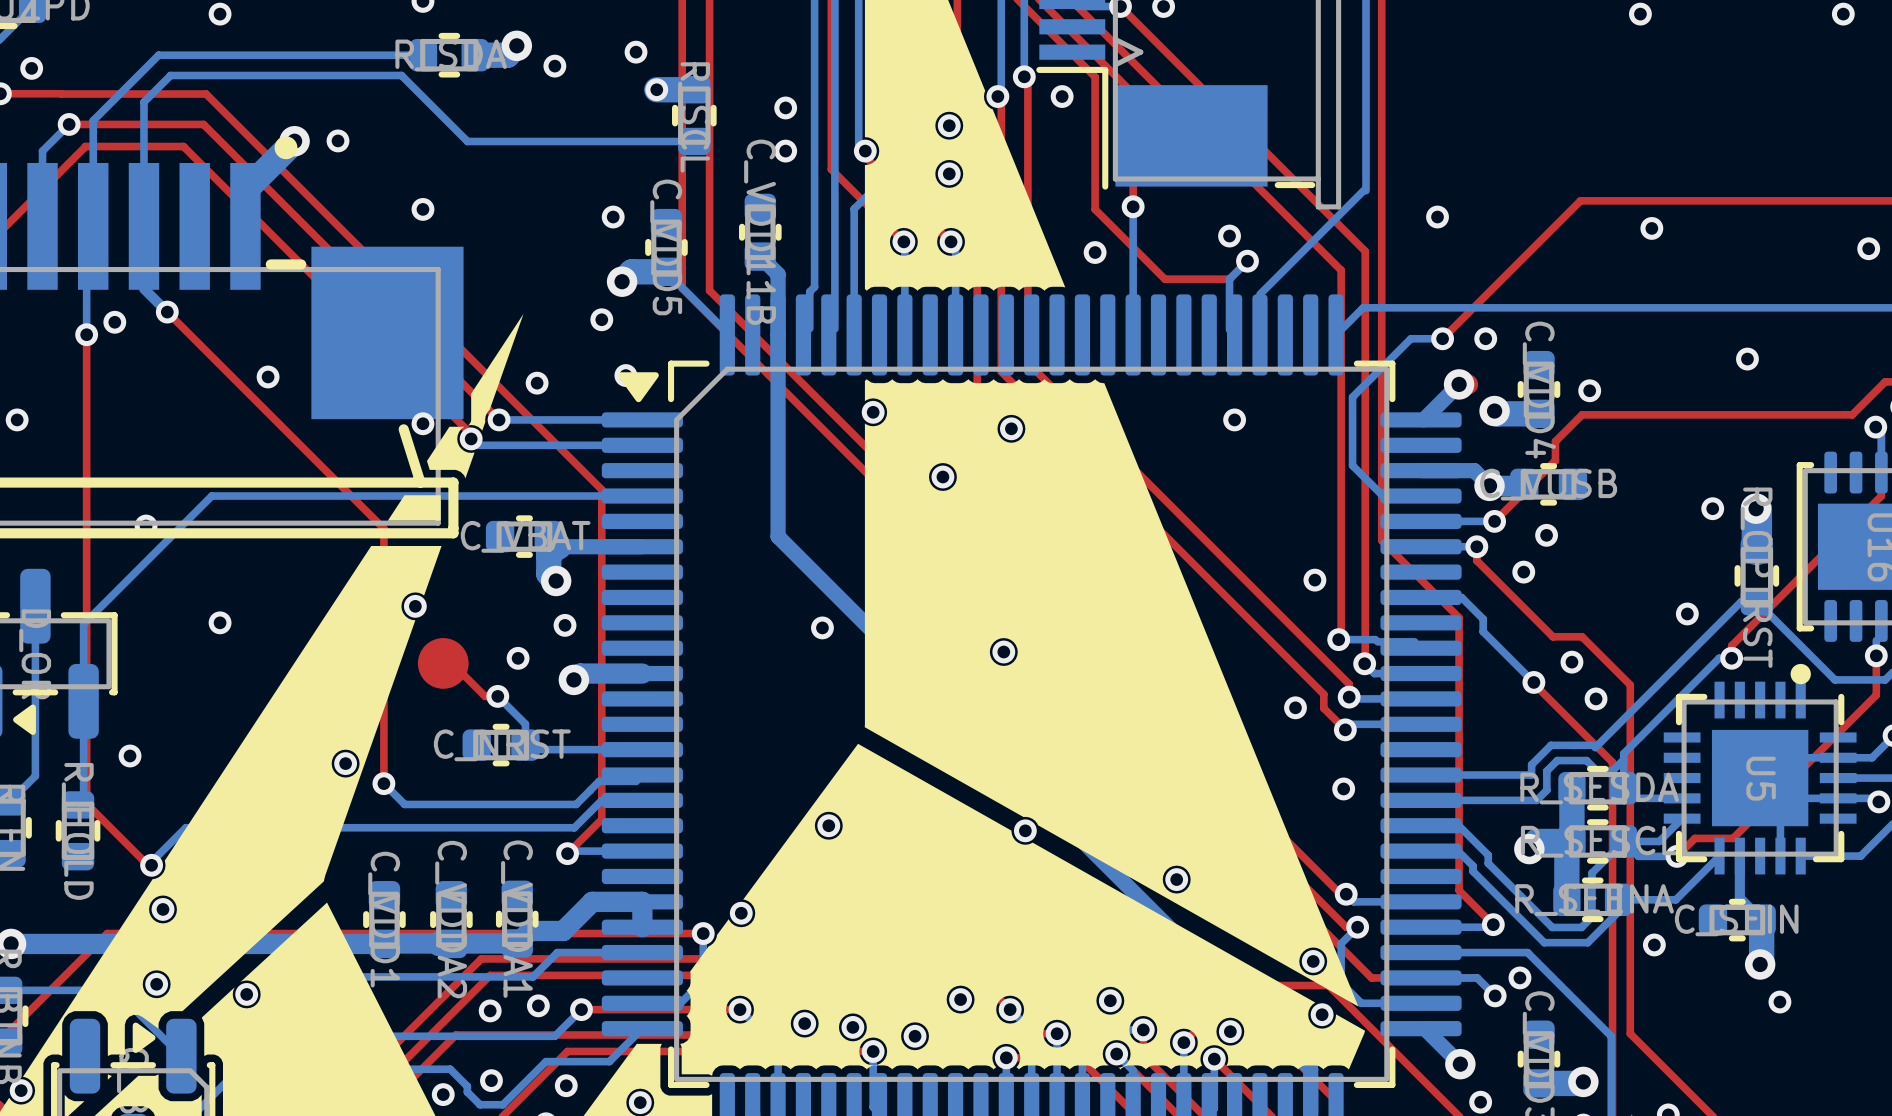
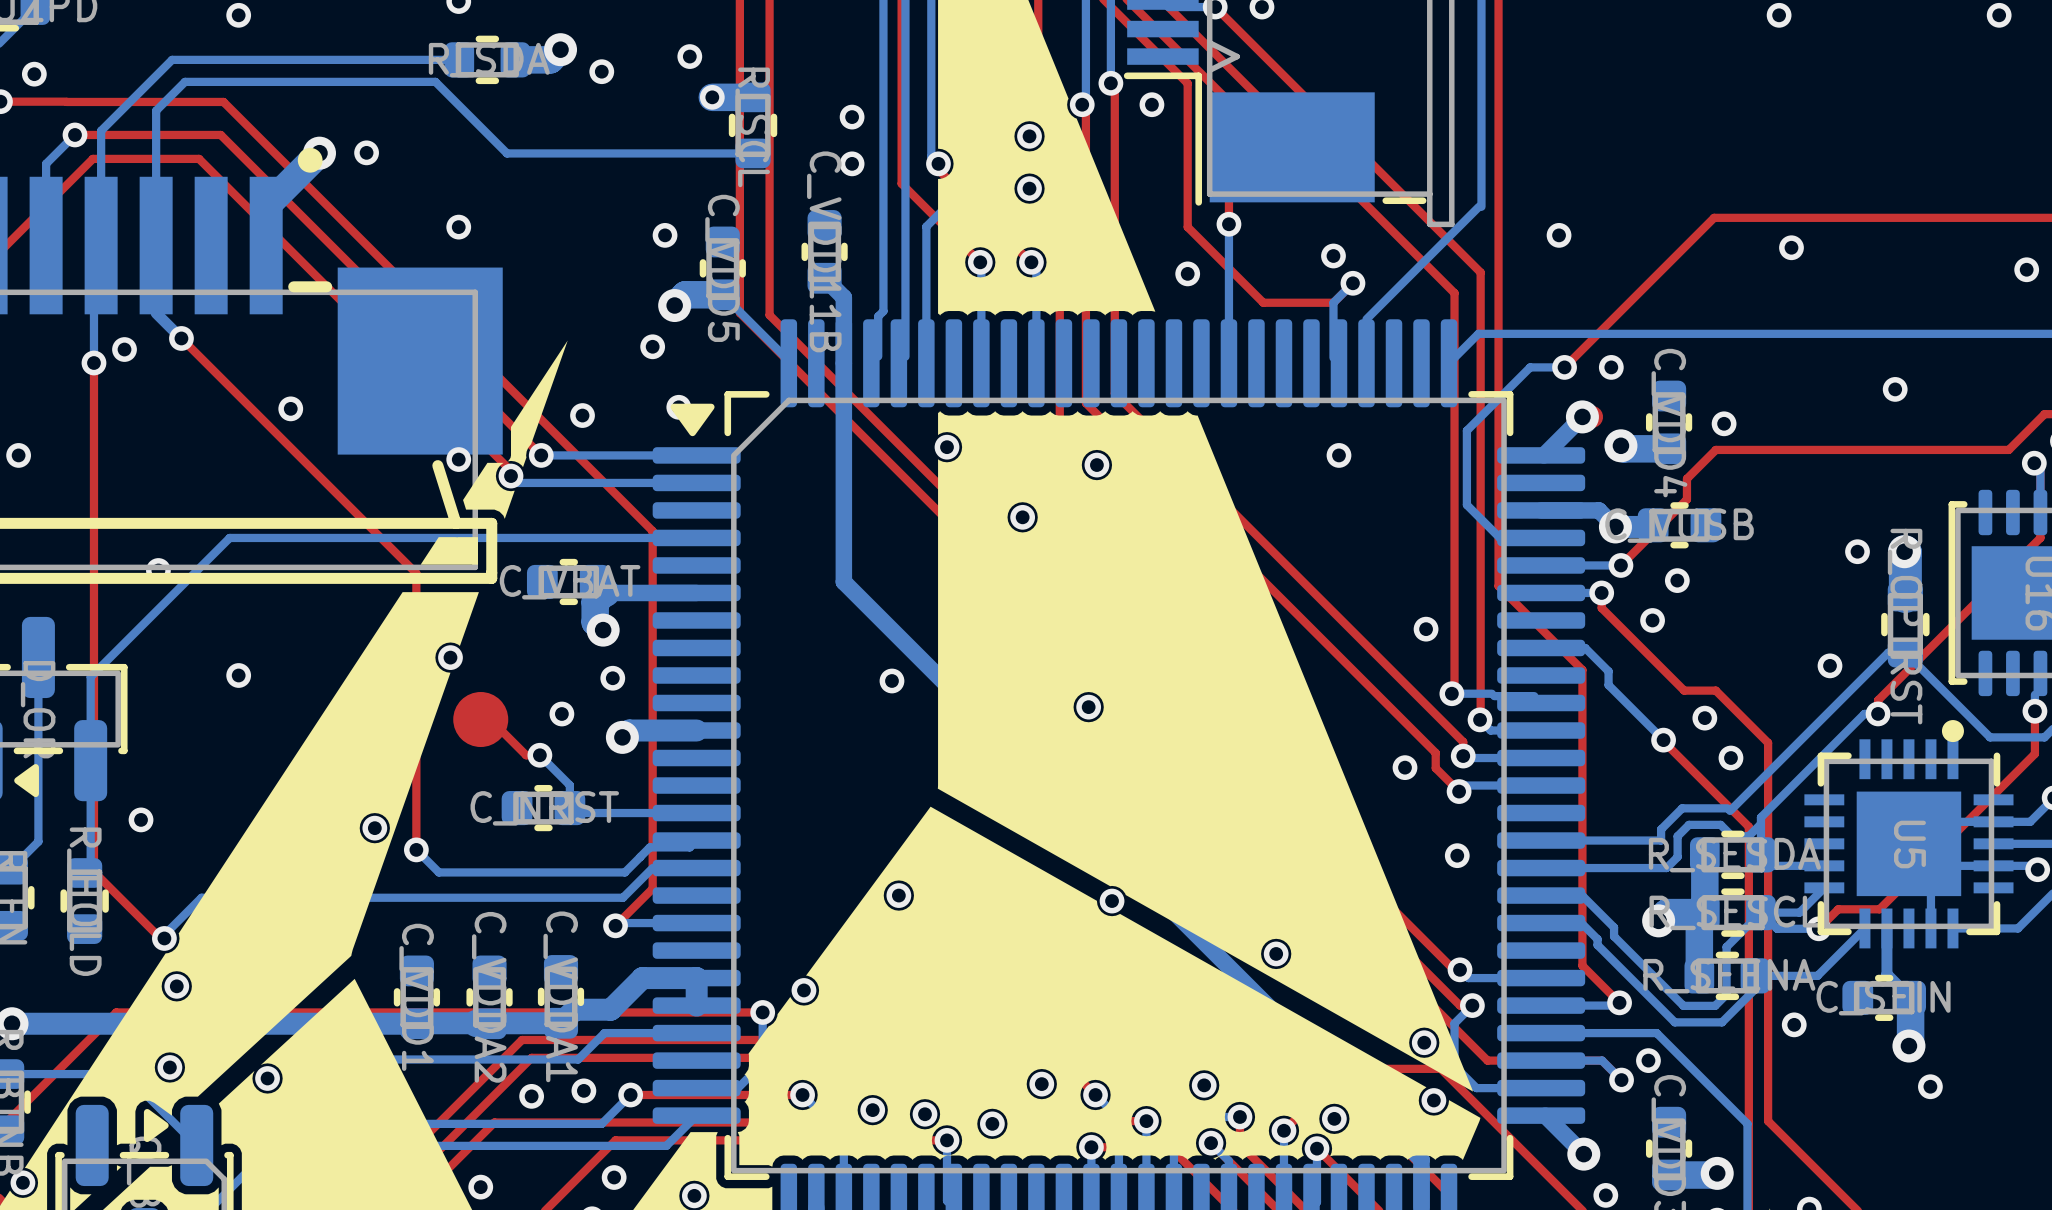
bottom track: (614, 1056) (609, 1061) (545, 1061) (502, 1104) (480, 1104) (467, 1092) (467, 1086) (450, 1069) (378, 1069) -> (666, 1145) (424, 1145) (410, 1159)
via: (491, 1080) -> none

